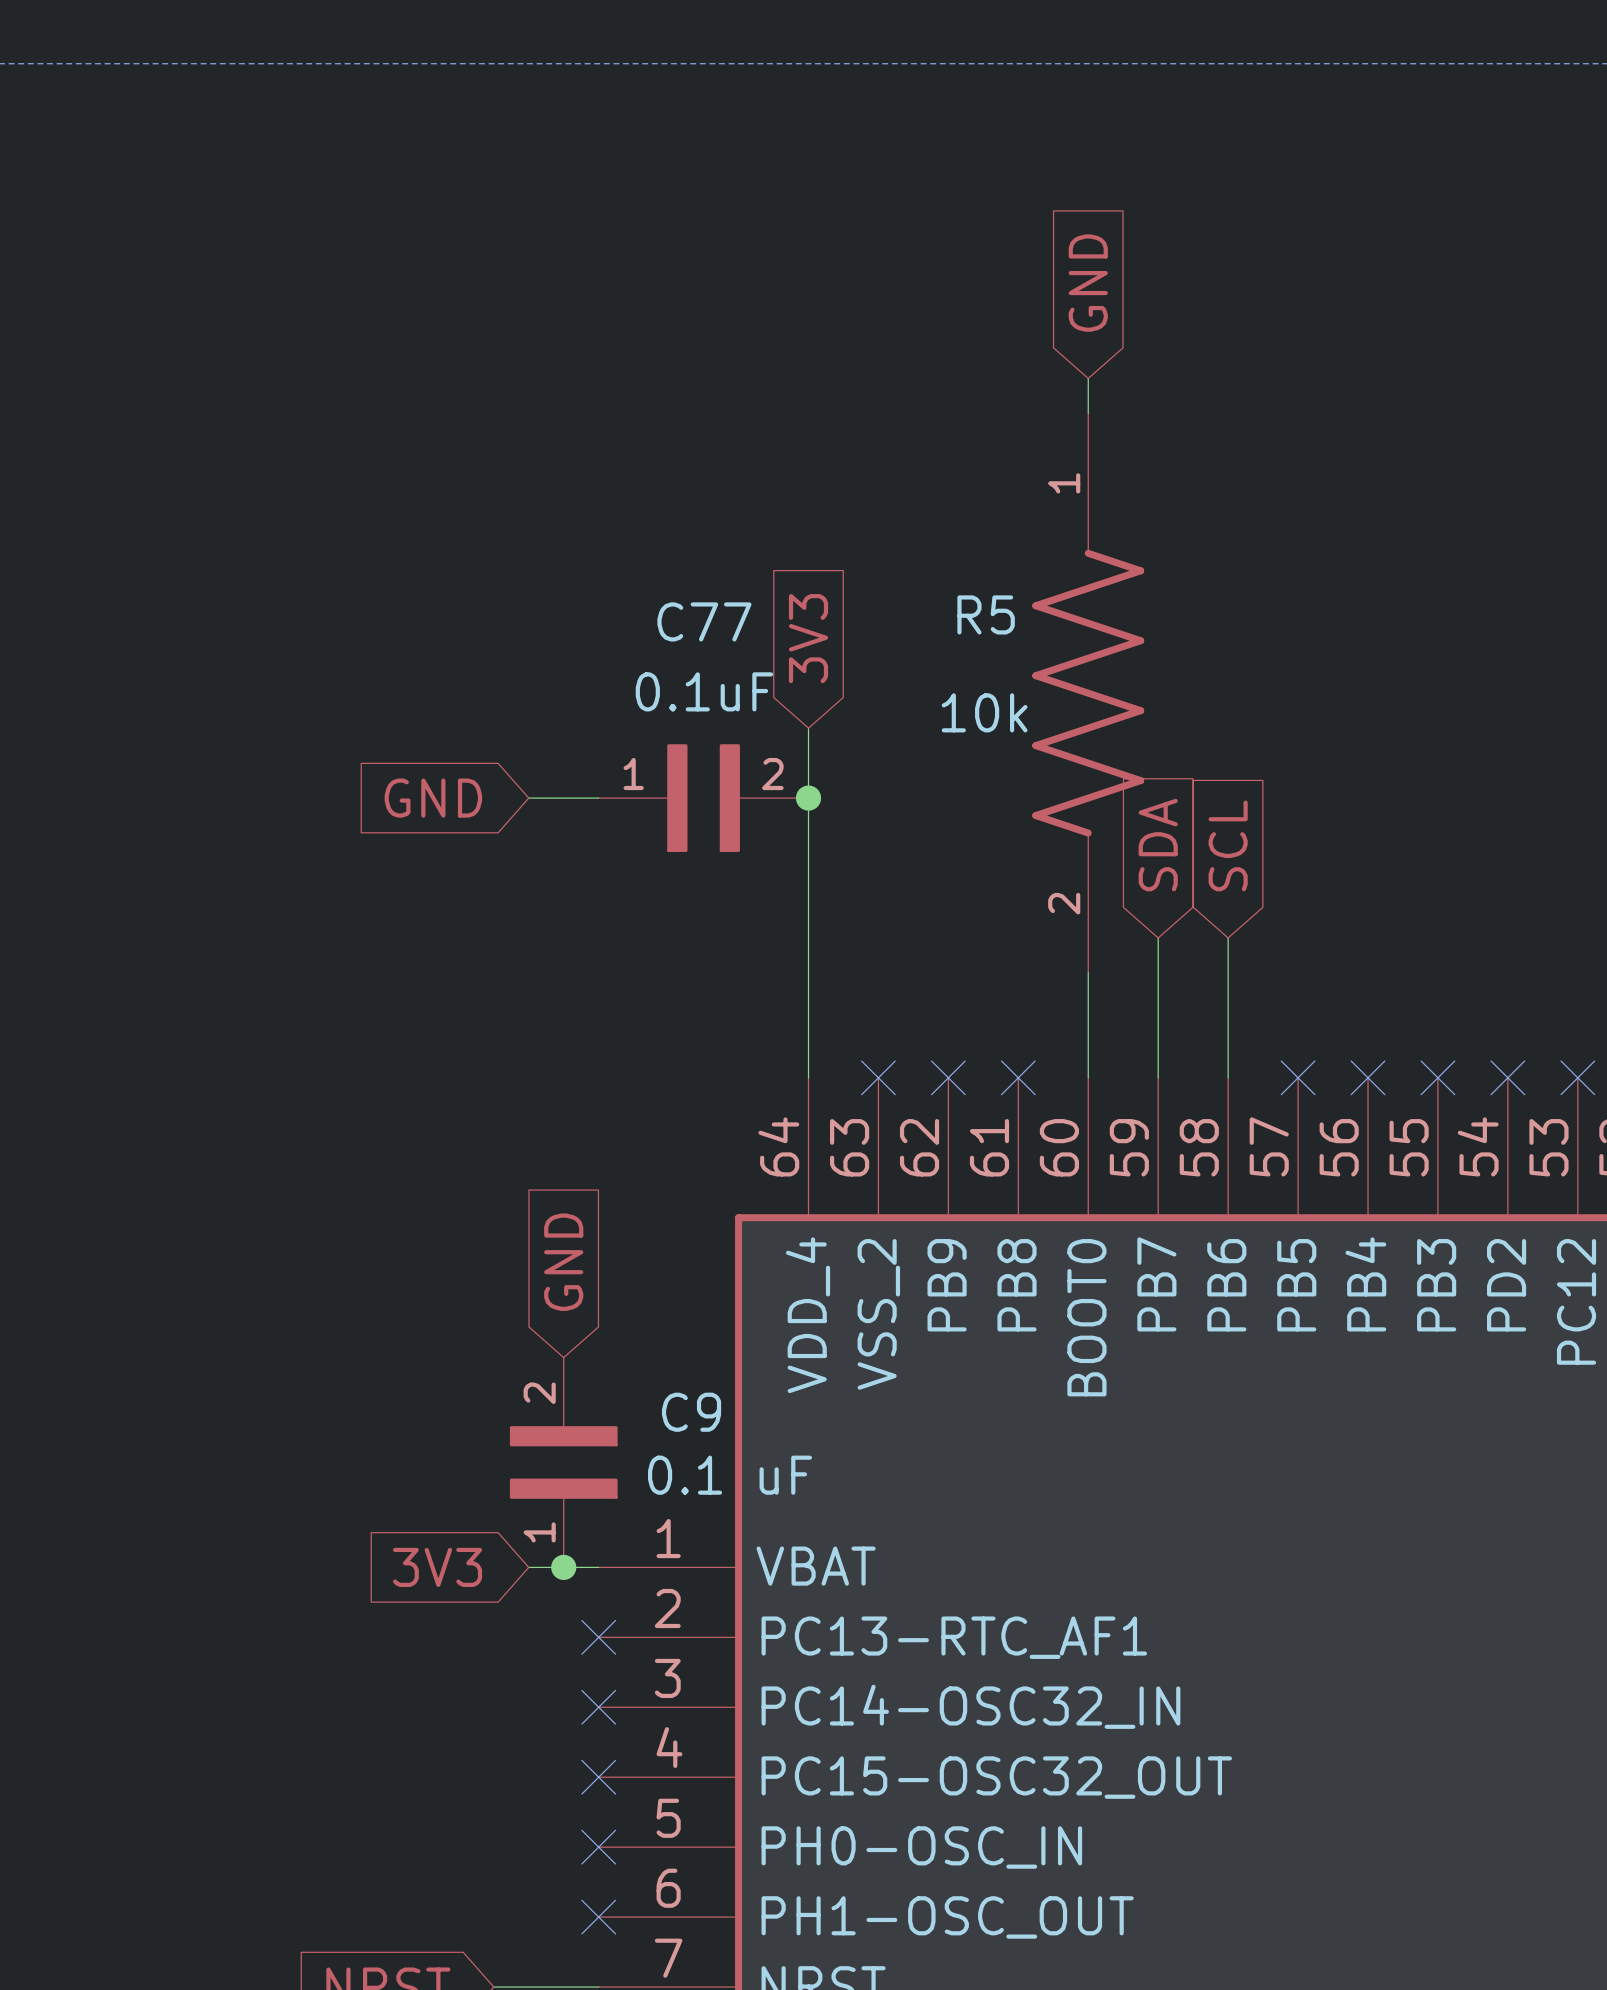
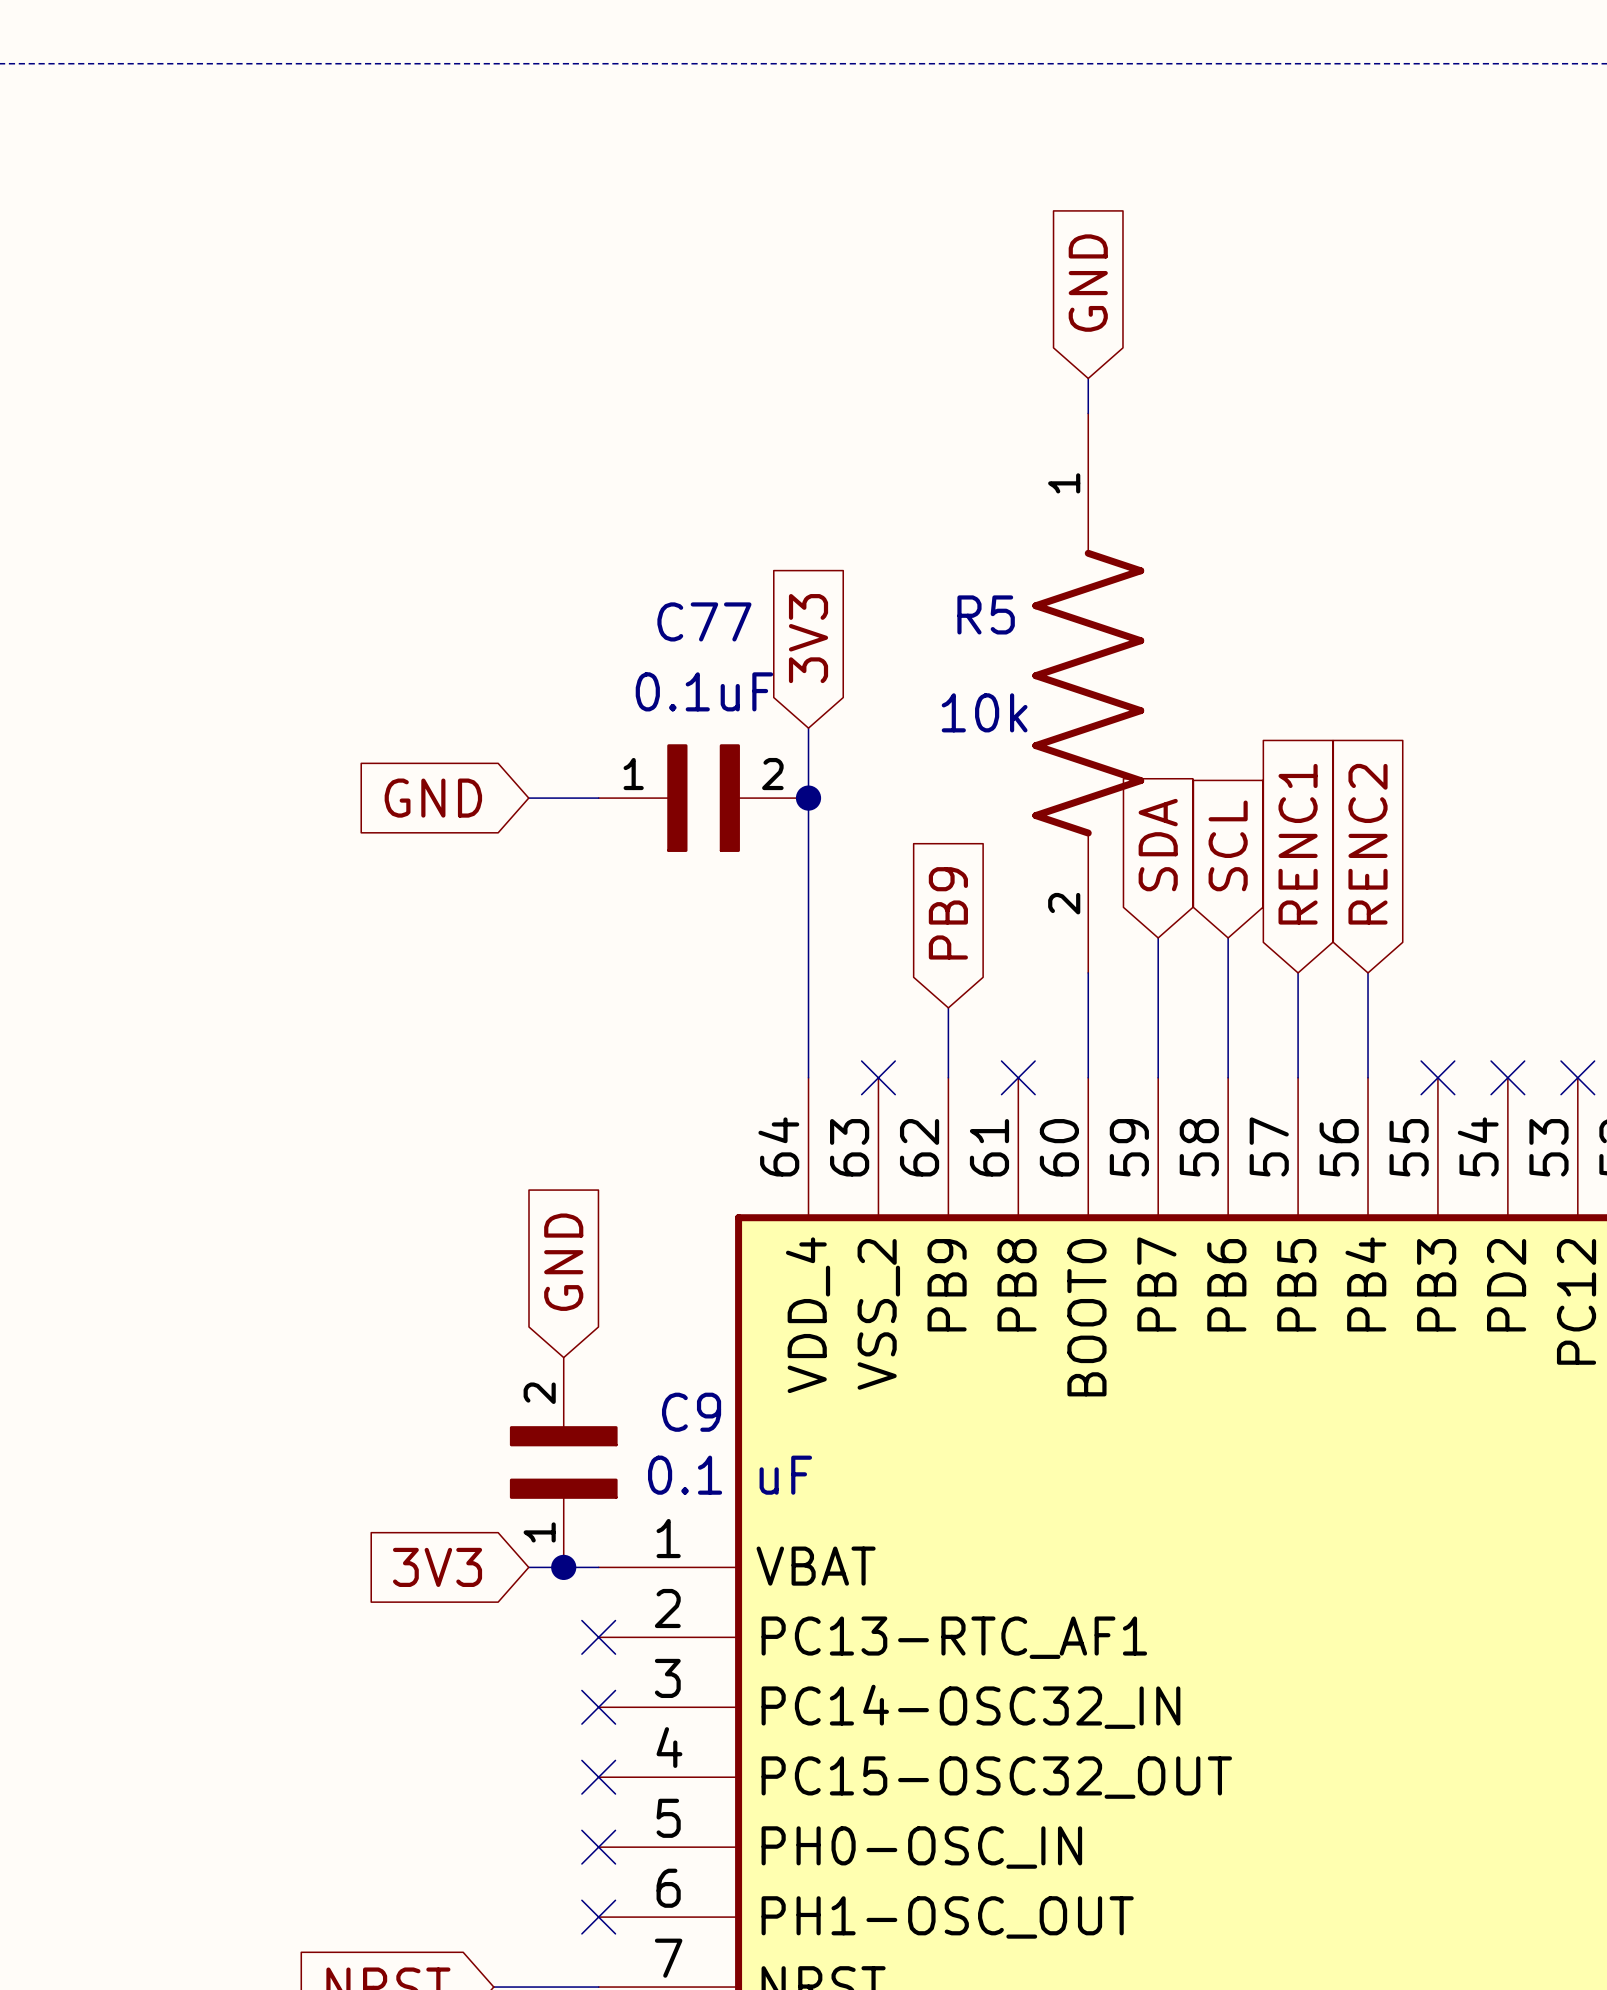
global label: none -> RENC1 (1298, 844)
global label: none -> RENC2 (1368, 844)
global label: none -> PB9 (948, 913)
wire: none -> (1298, 972) (1298, 1077)
wire: none -> (1368, 972) (1368, 1077)
wire: none -> (948, 1007) (948, 1077)
no-connect mark: (948, 1077) -> none
no-connect mark: (1298, 1077) -> none
no-connect mark: (1368, 1077) -> none

